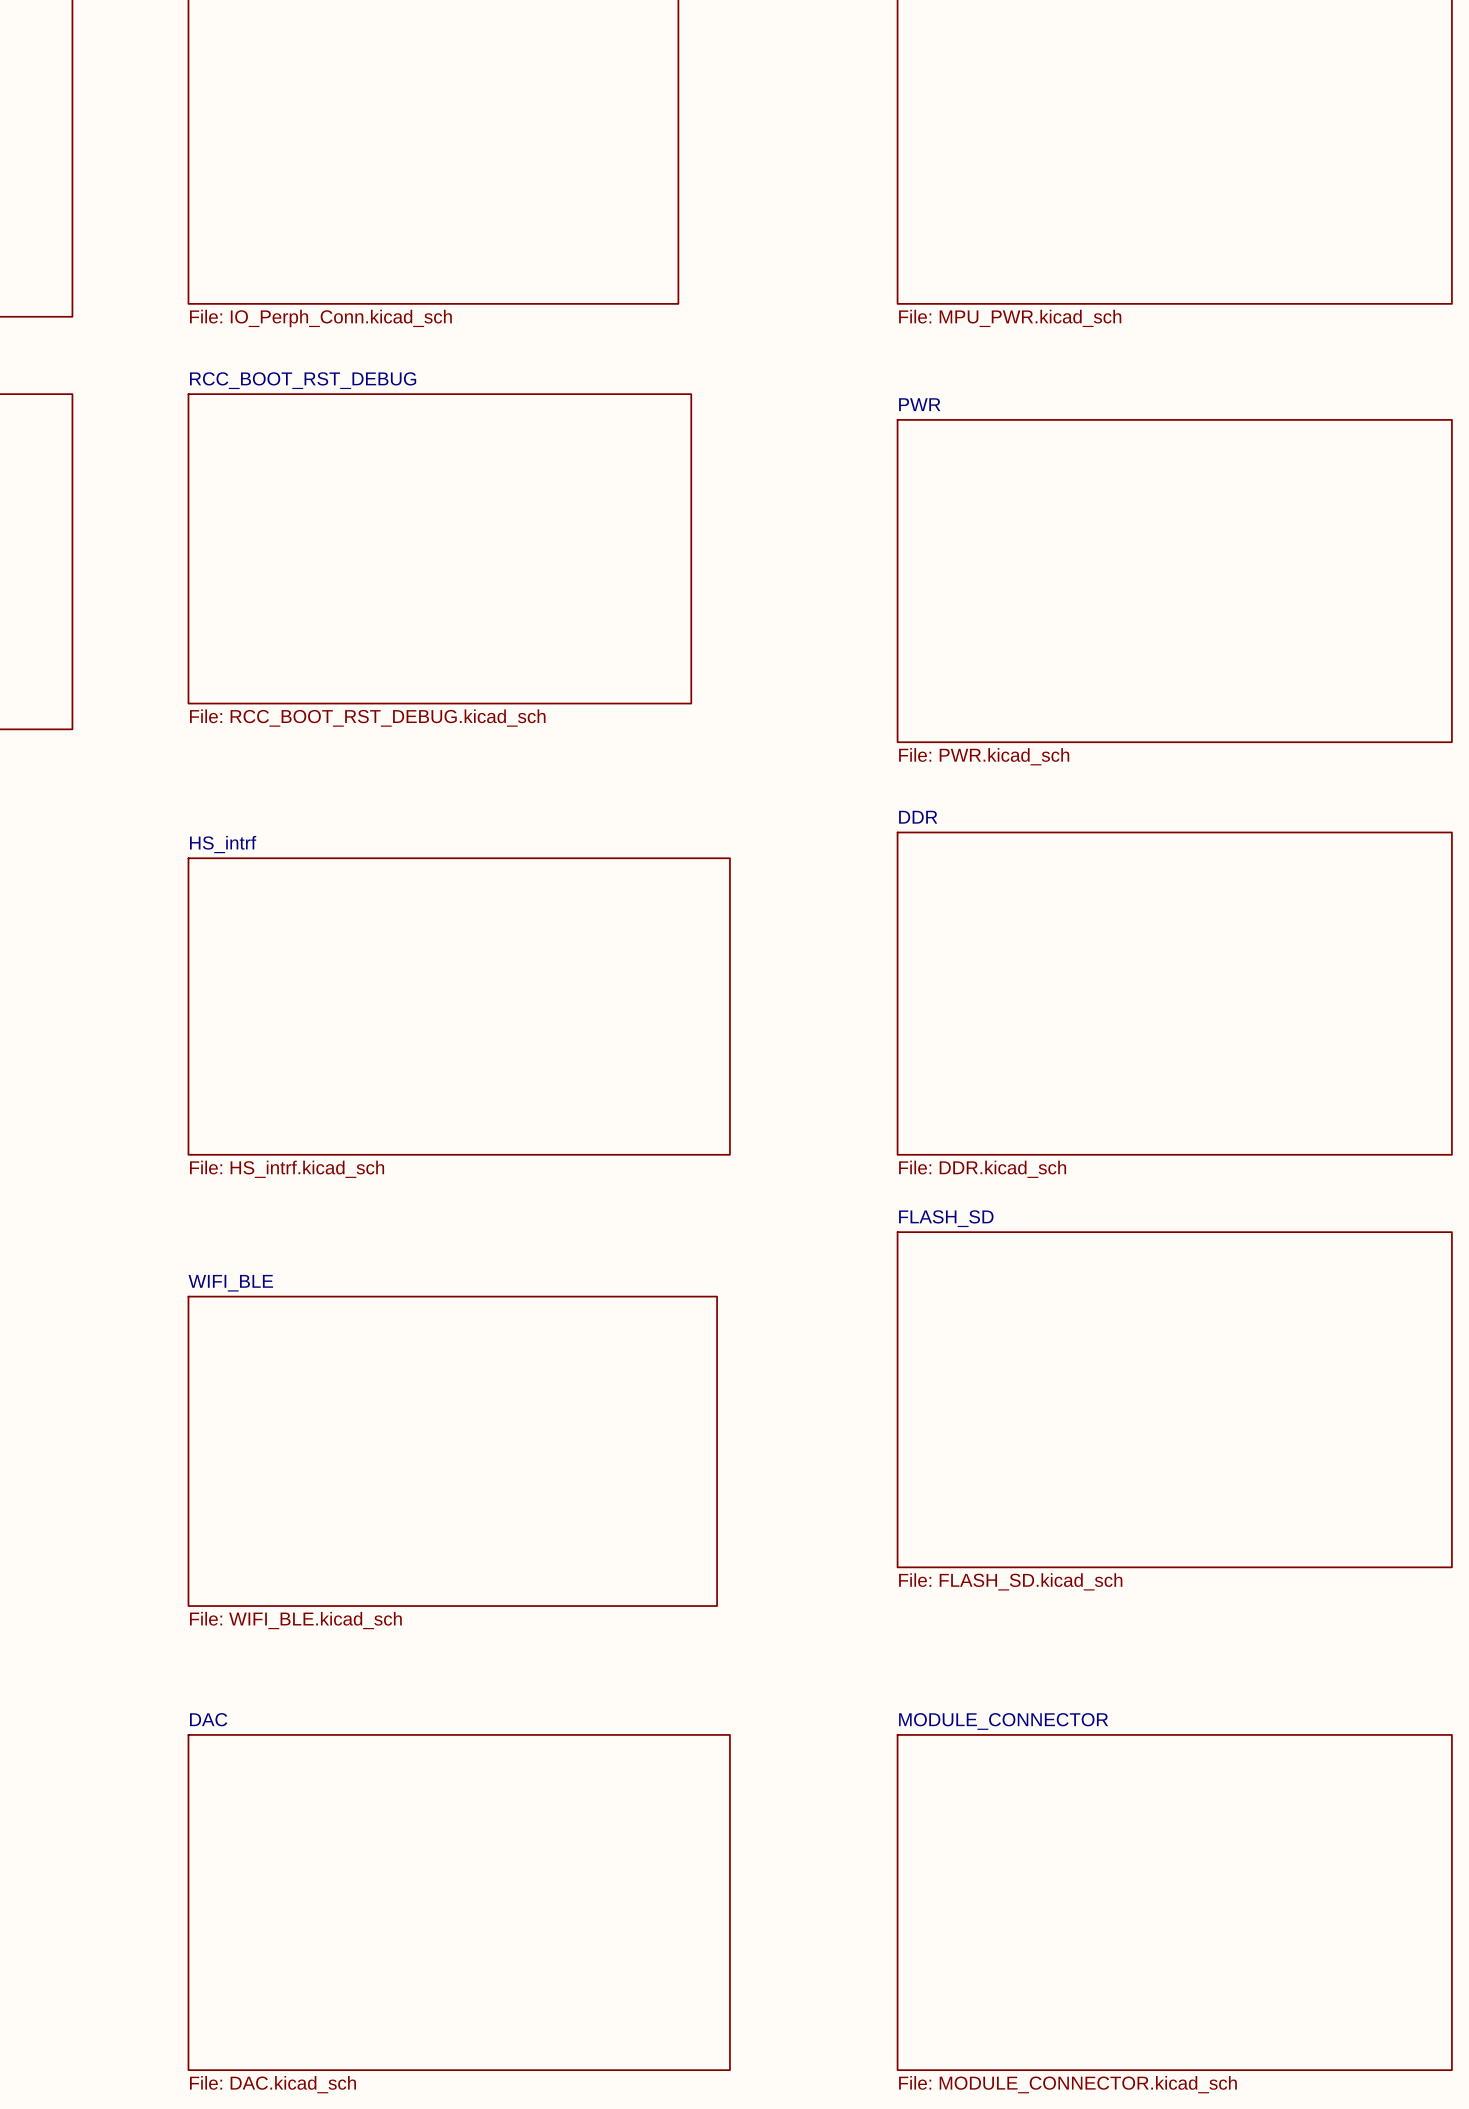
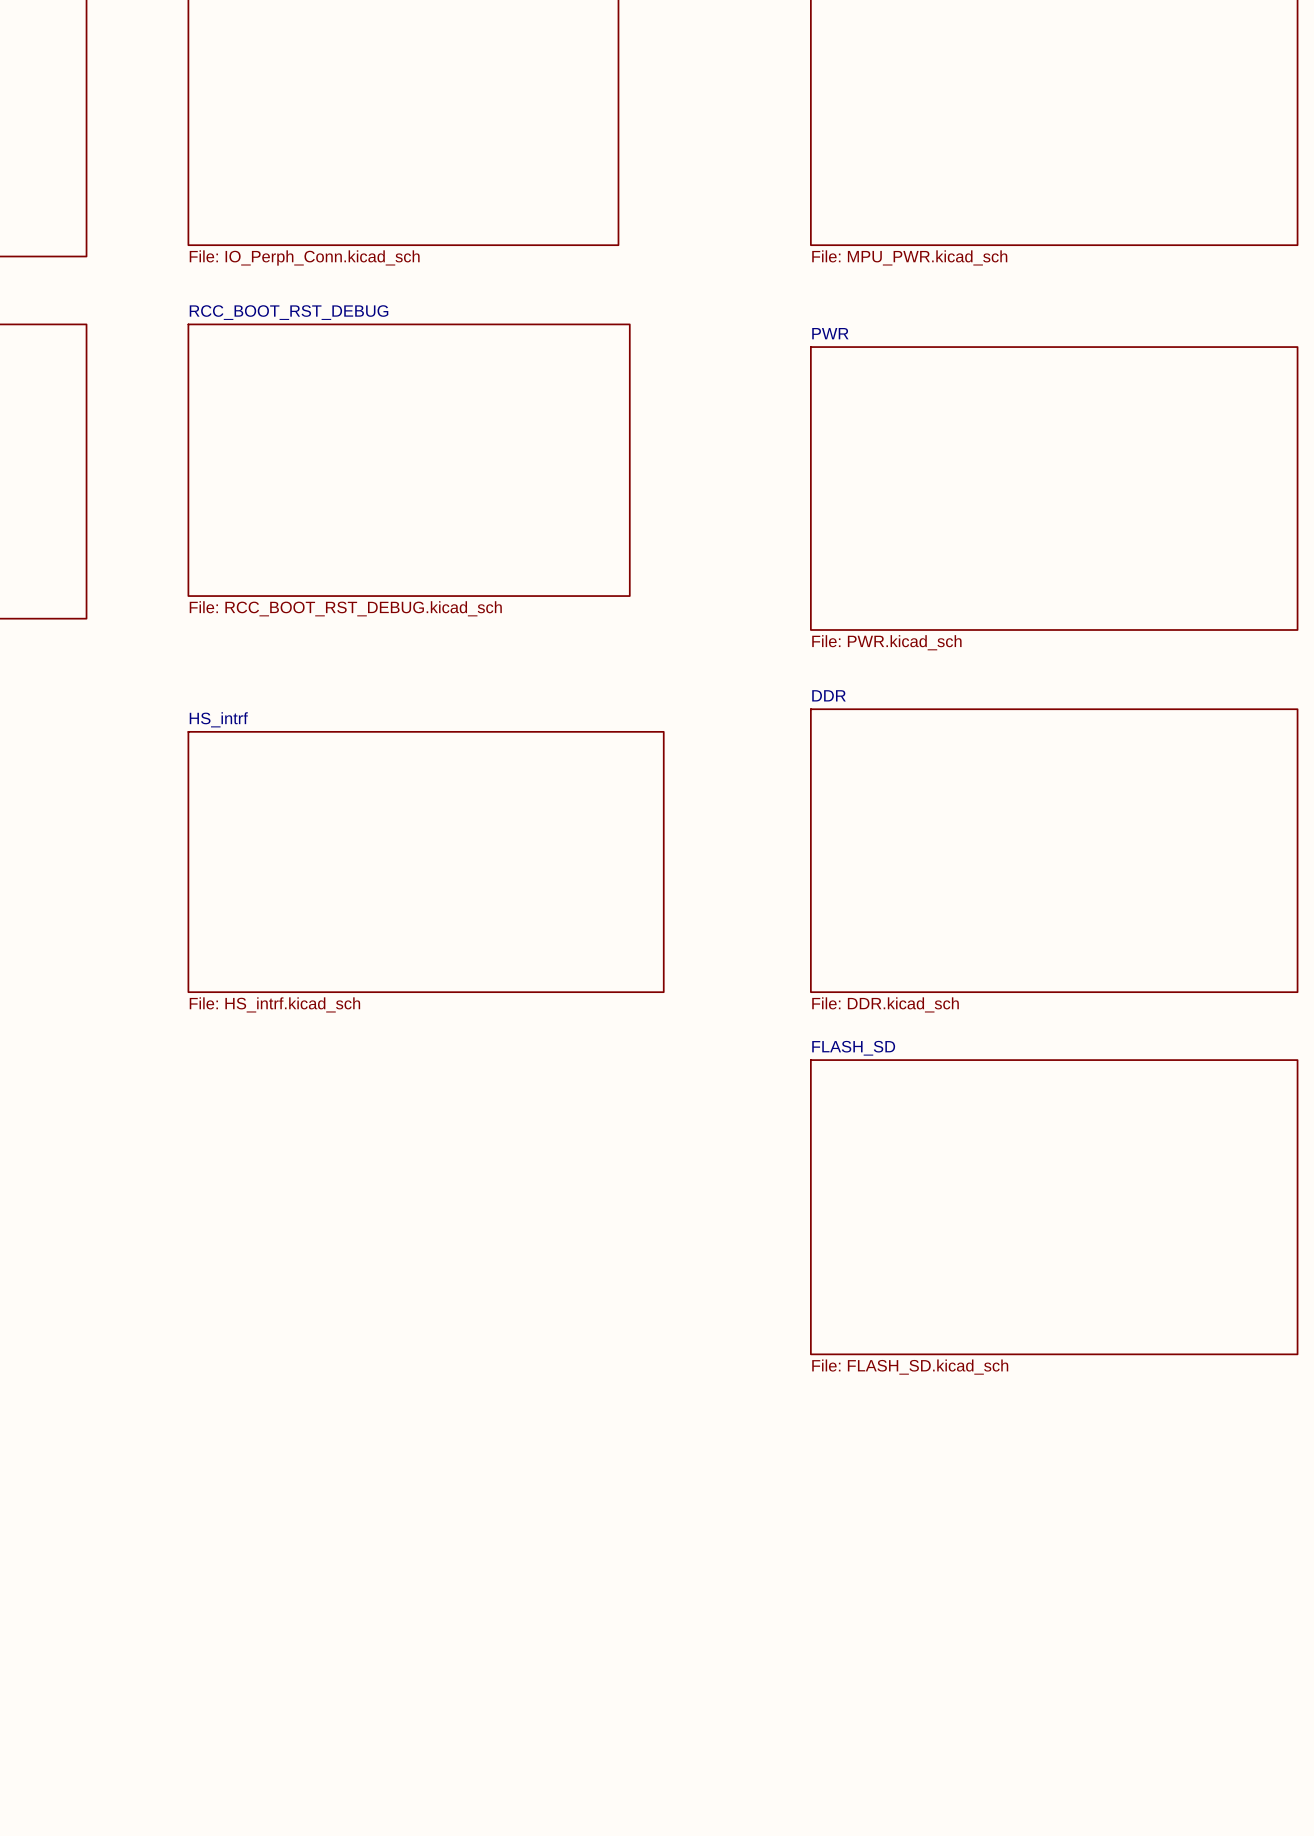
sheet WIFI_BLE: File: WIFI_BLE.kicad_sch (452, 1451) -> none
sheet DAC: File: DAC.kicad_sch (459, 1902) -> none
sheet MODULE_CONNECTOR: File: MODULE_CONNECTOR.kicad_sch (1174, 1902) -> none

